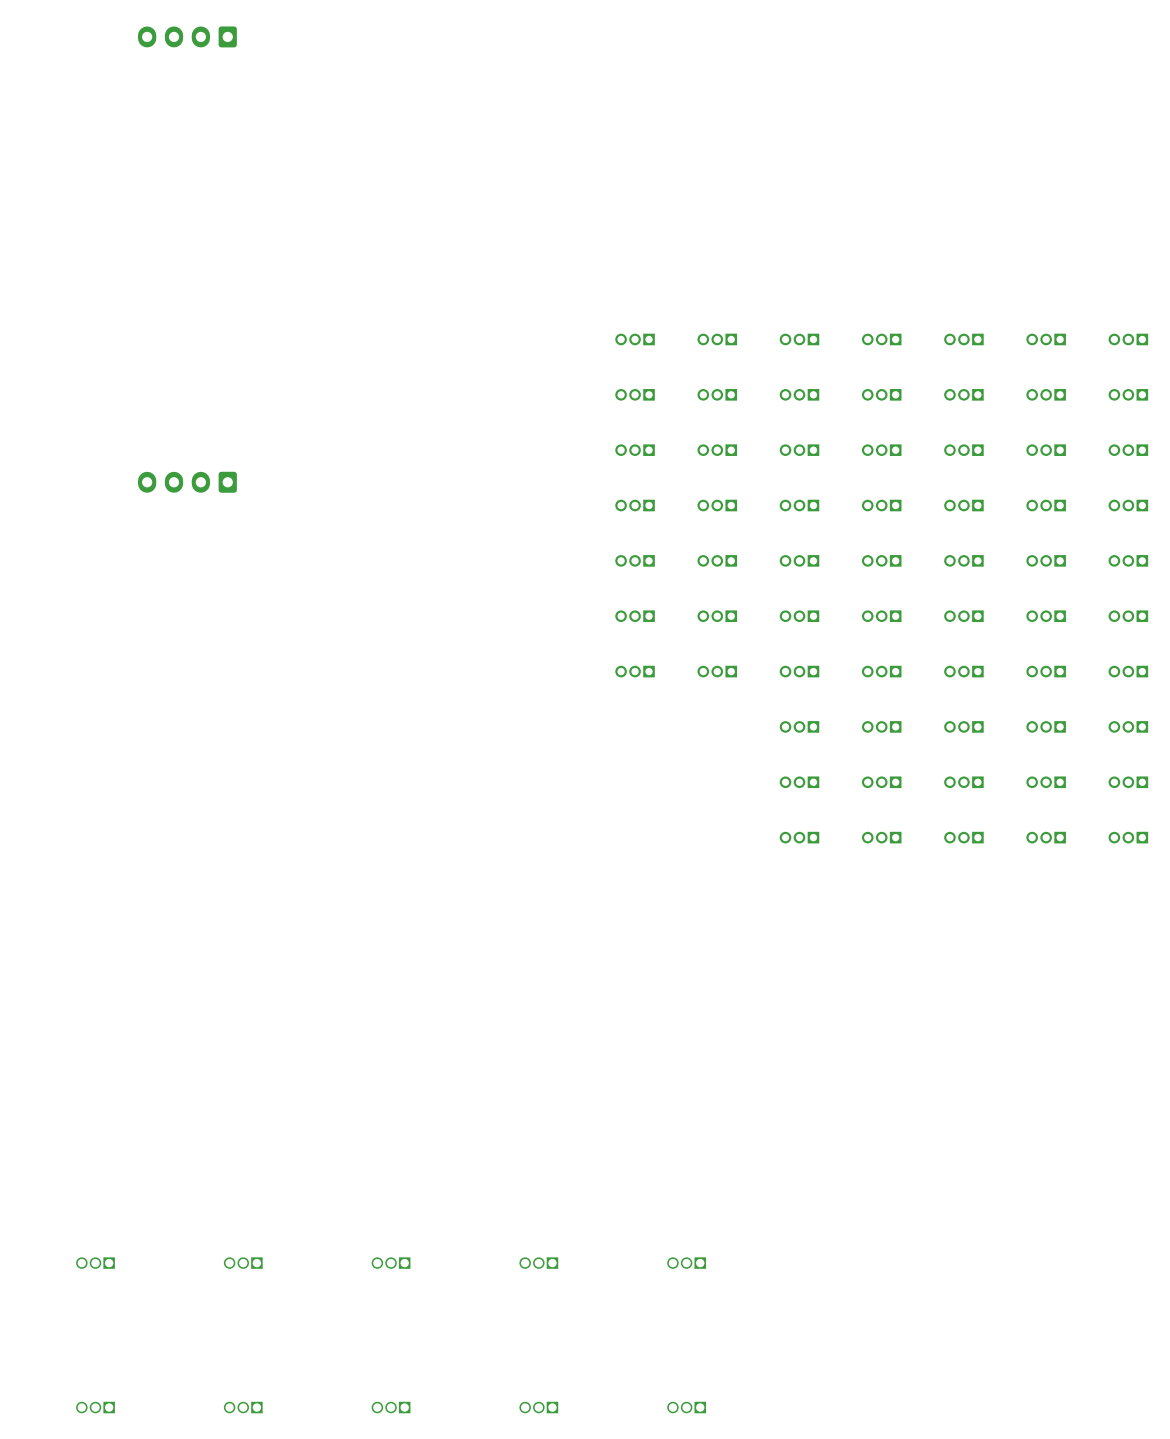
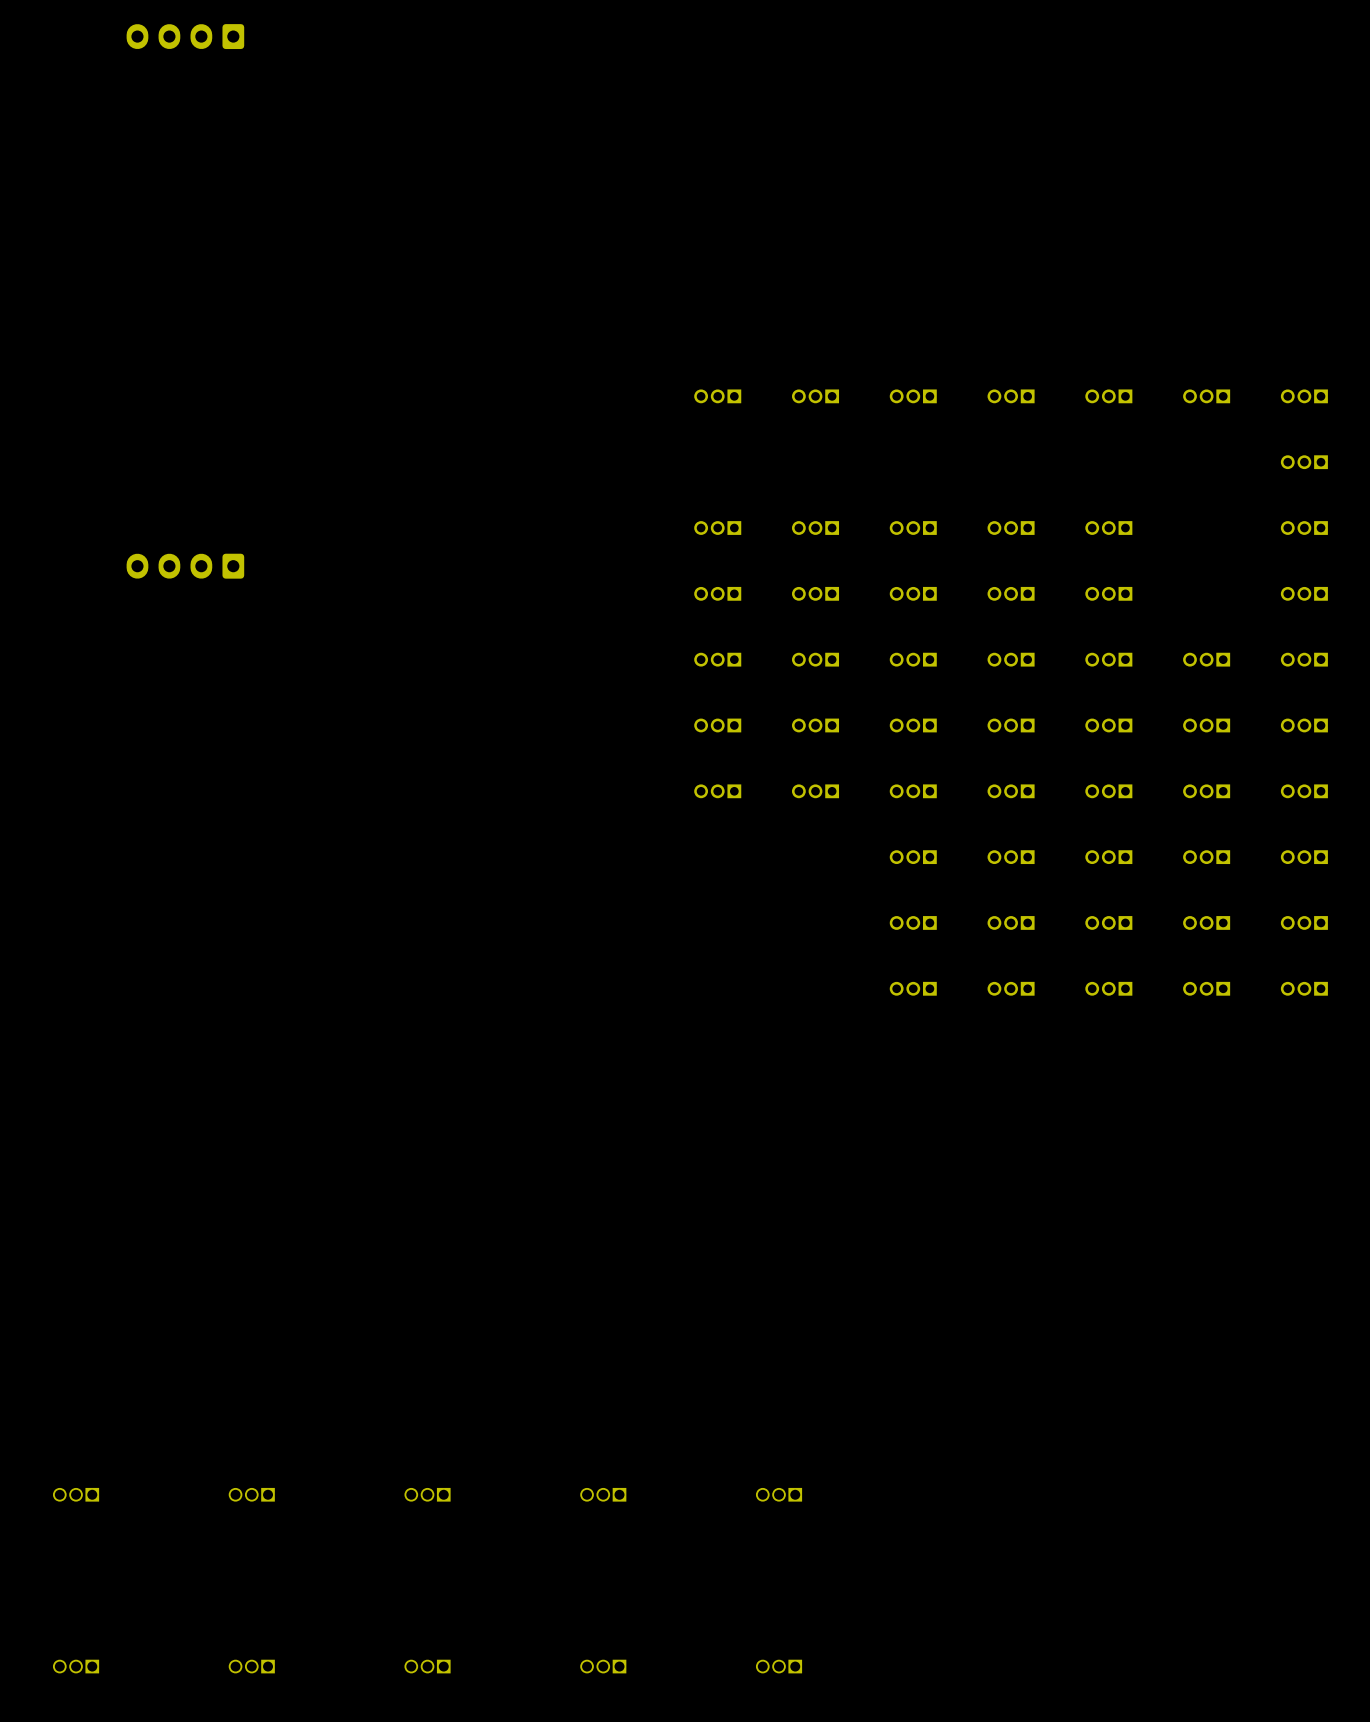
part: (635, 394) -> none
part: (717, 394) -> none
part: (799, 394) -> none
part: (881, 394) -> none
part: (963, 394) -> none
part: (1046, 394) -> none
part: (1046, 450) -> none
part: (1046, 505) -> none

